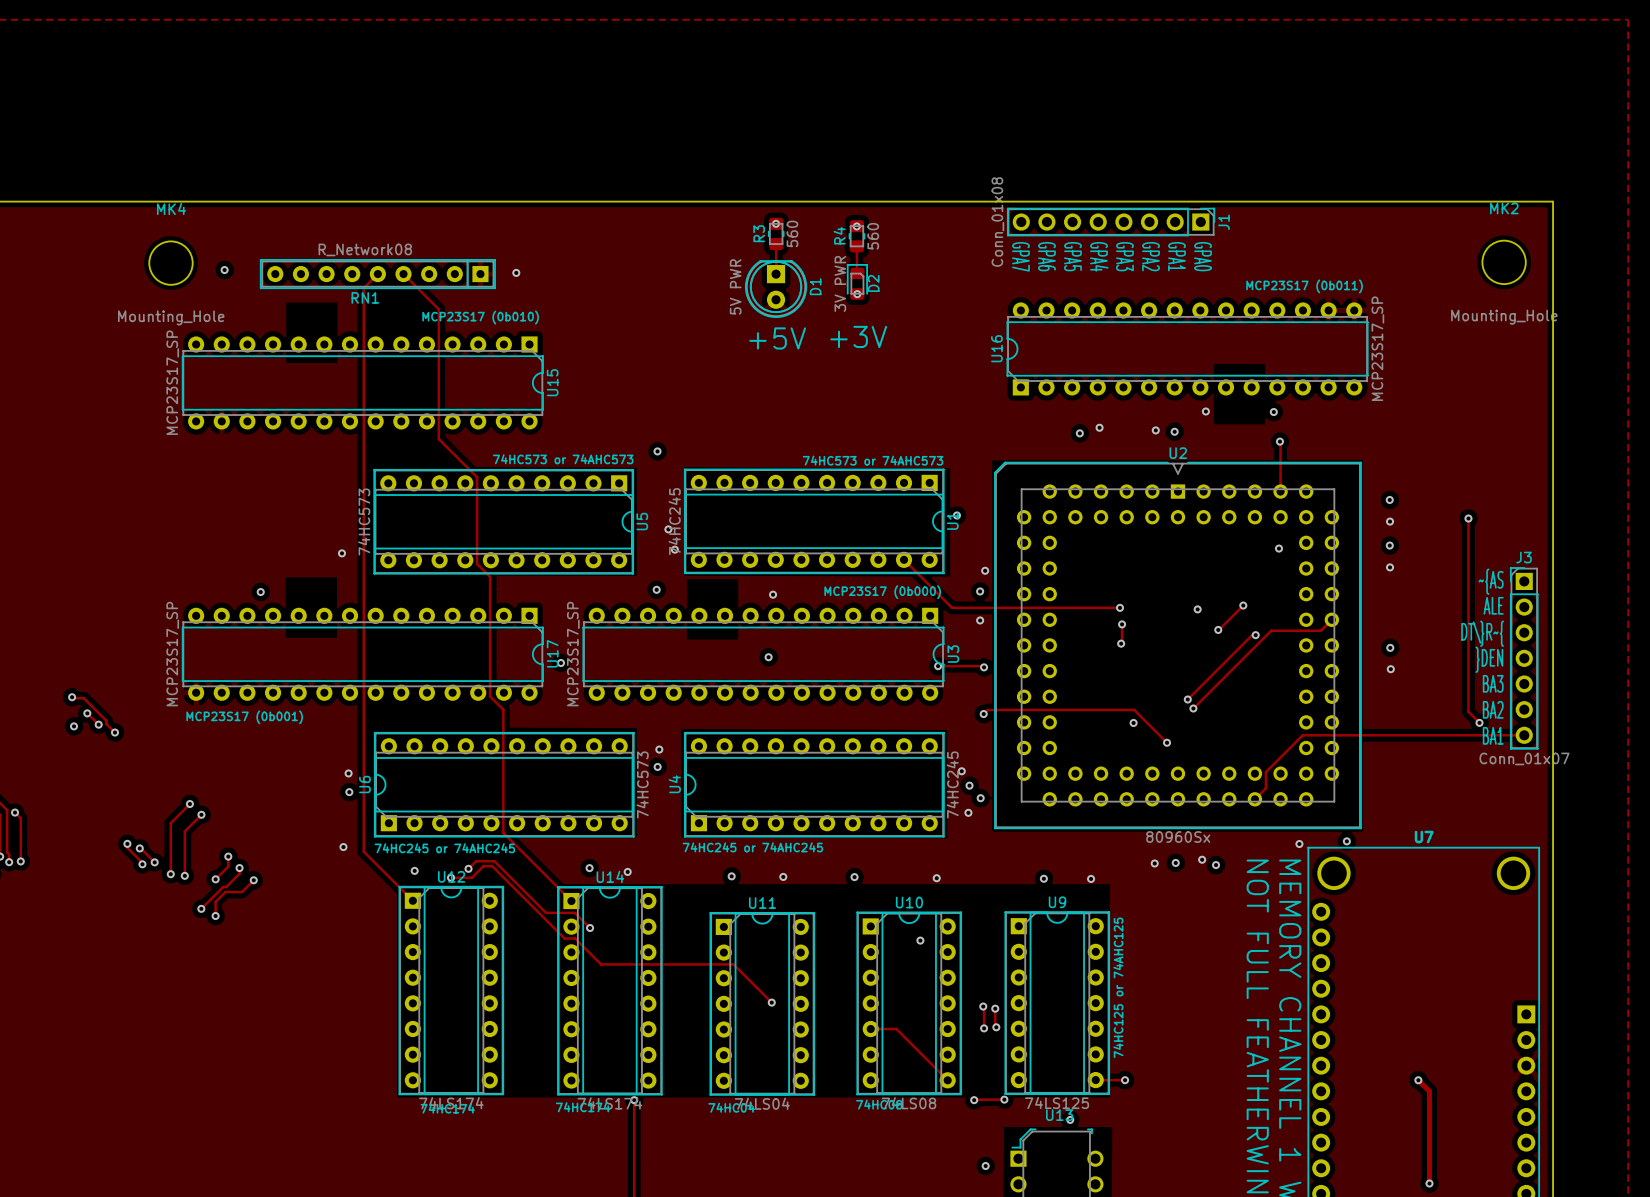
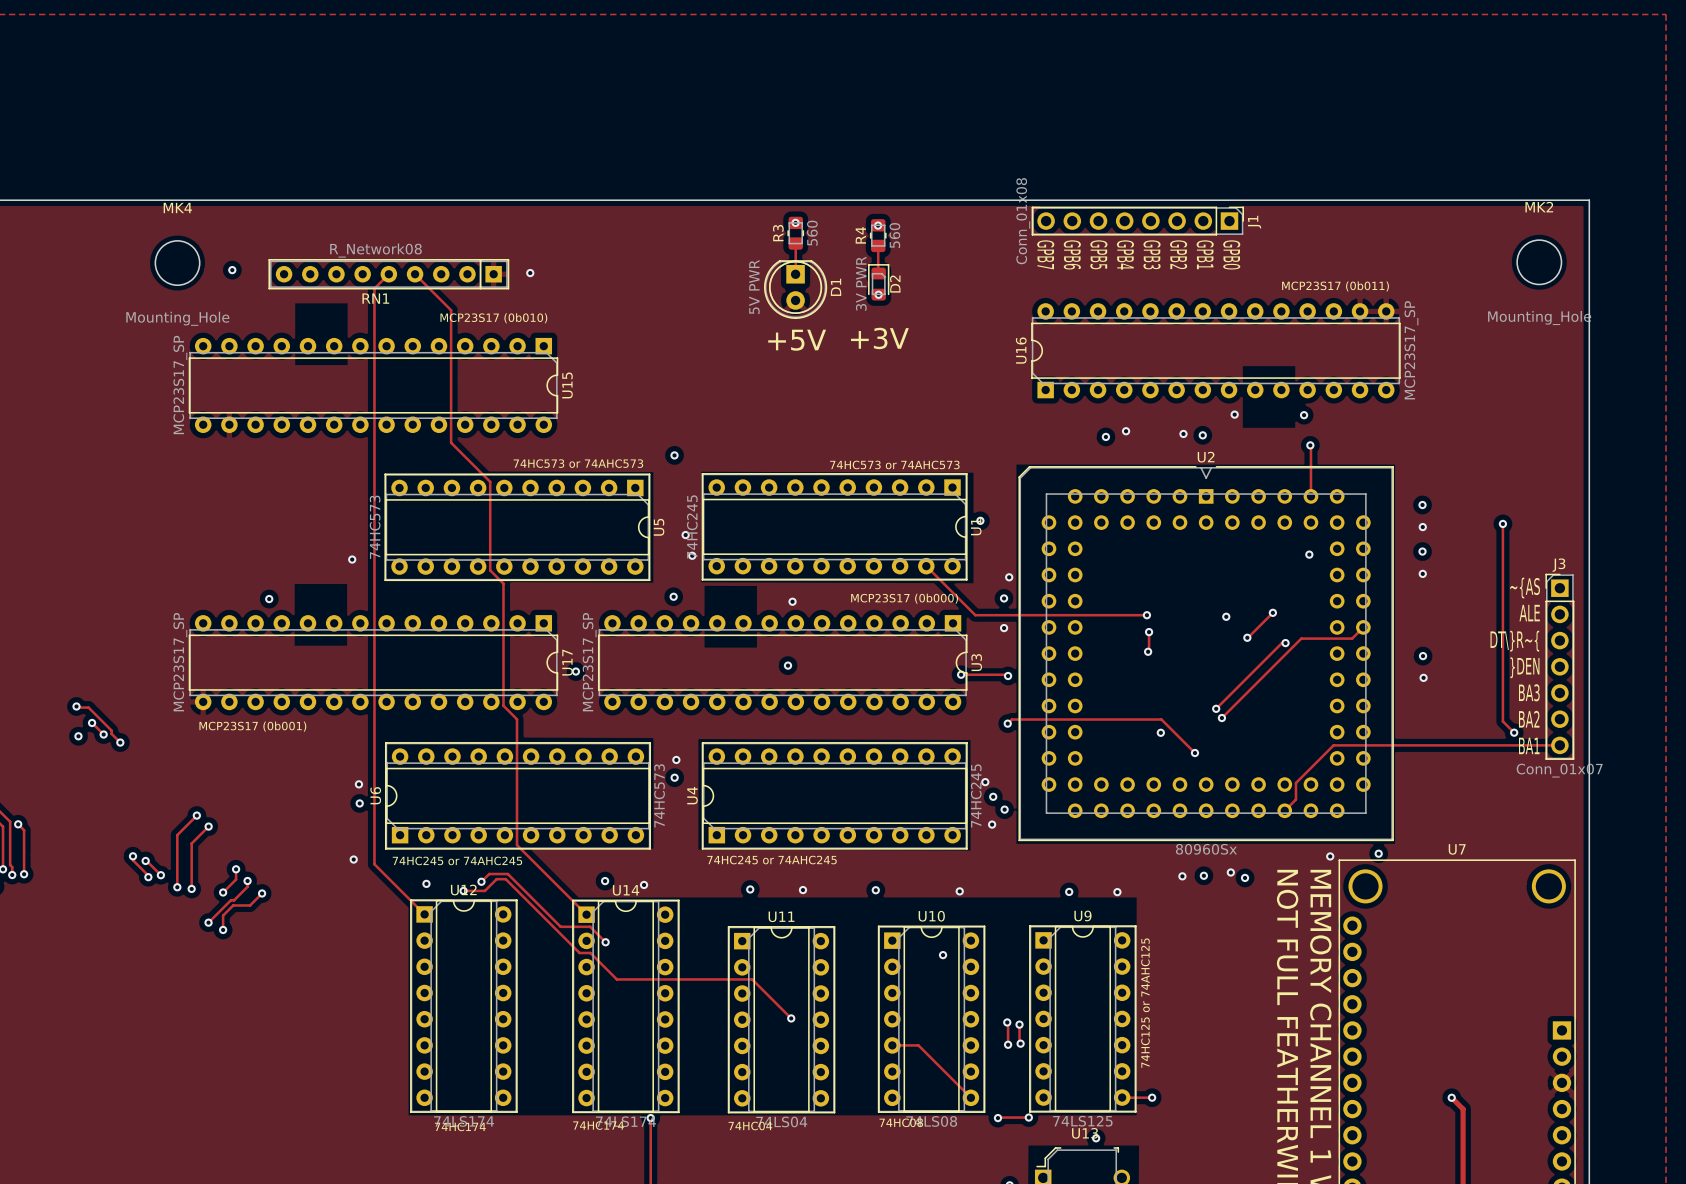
text: GPA7 (1020, 256) -> GPB7 (1045, 254)
text: GPA6 (1046, 256) -> GPB6 (1072, 254)
text: GPA5 (1072, 256) -> GPB5 (1098, 254)
text: GPA4 (1099, 256) -> GPB4 (1125, 254)
text: GPA3 (1124, 256) -> GPB3 (1152, 254)
text: GPA2 (1151, 256) -> GPB2 (1178, 254)
text: GPA1 (1177, 256) -> GPB1 (1205, 254)
text: GPA0 (1203, 256) -> GPB0 (1231, 254)

